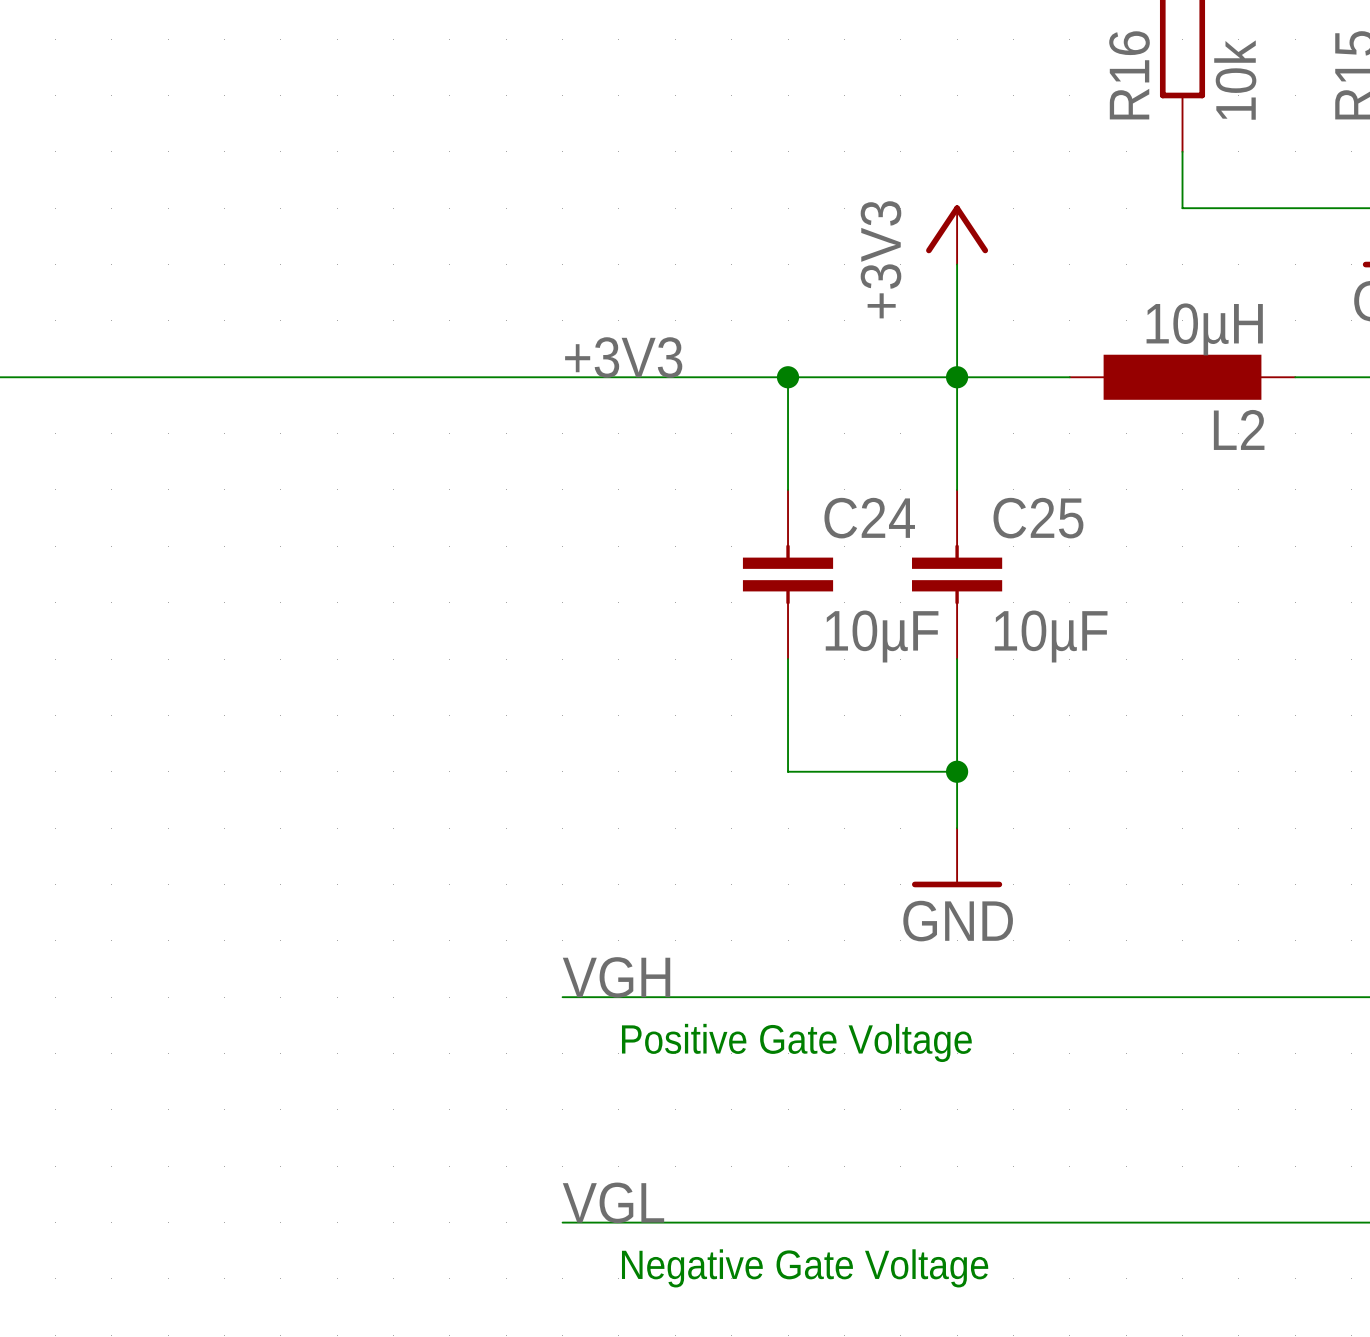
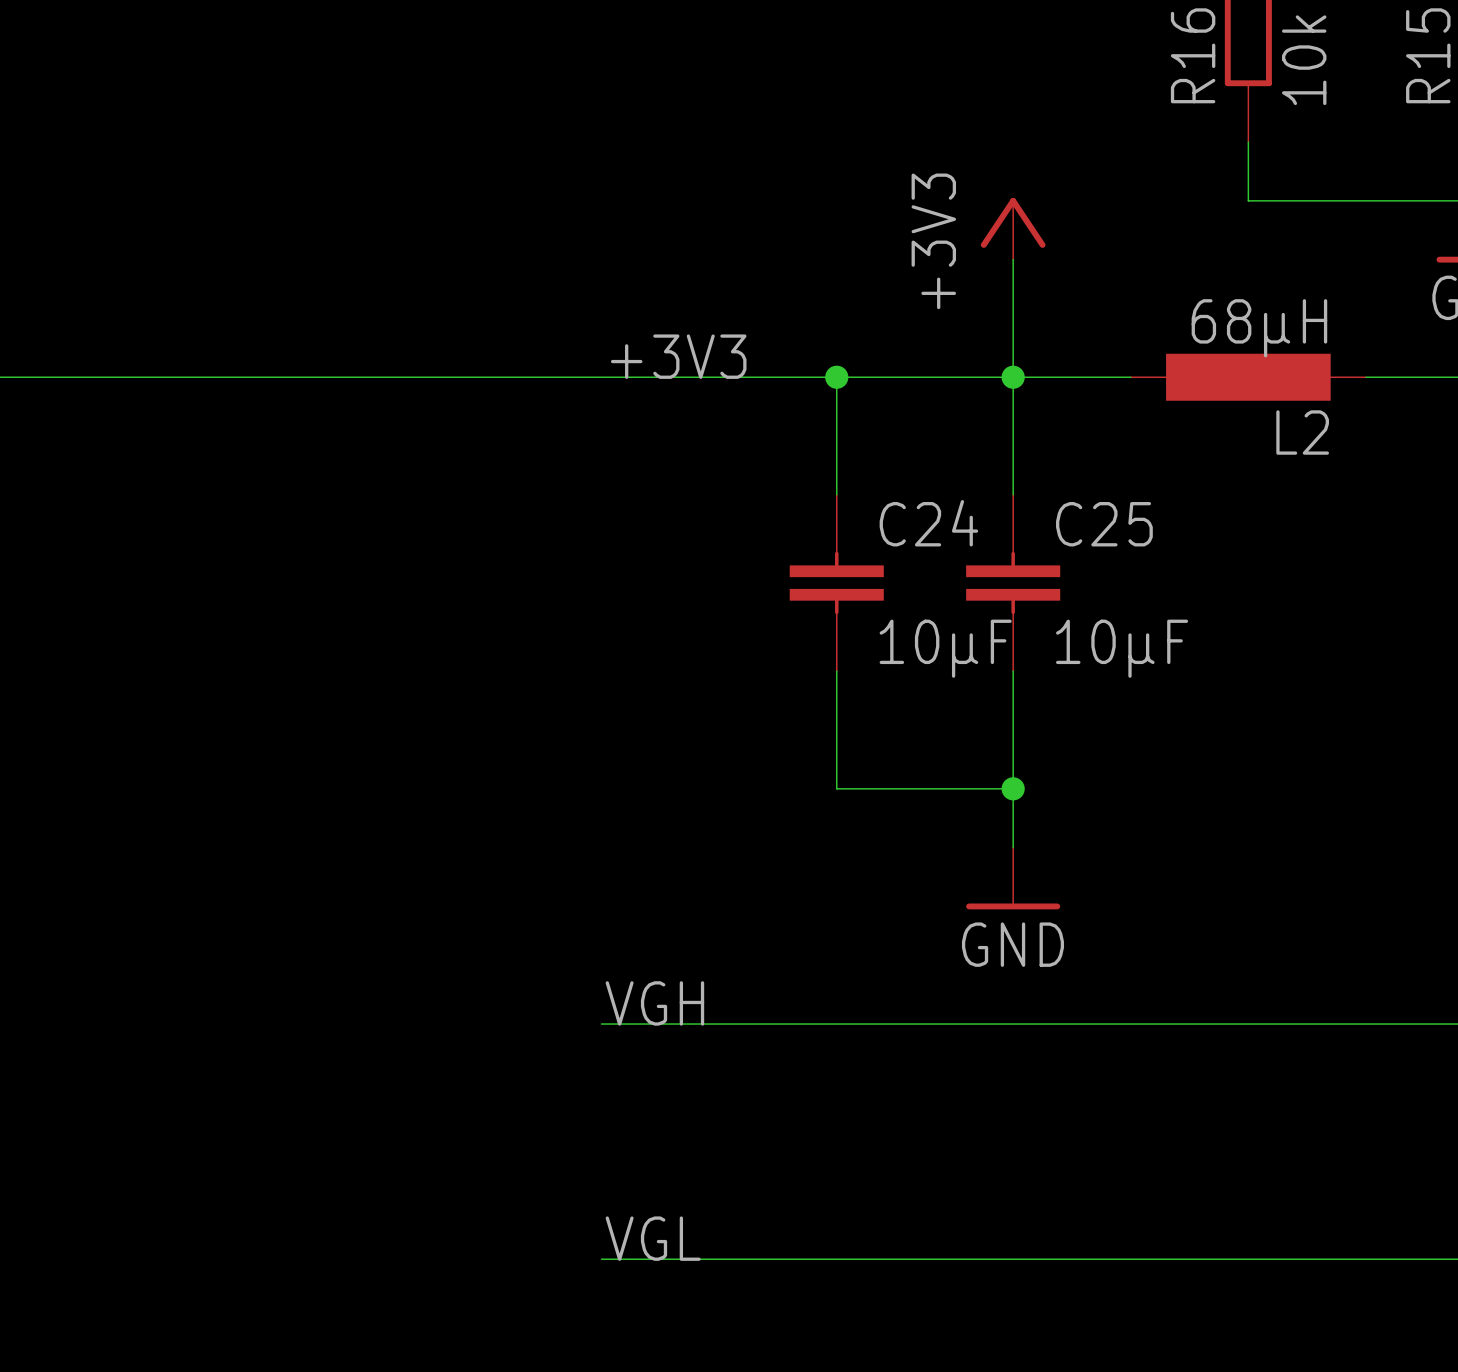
L2 value: 10µH (1204, 329) -> 68µH (1259, 328)
text: Positive Gate Voltage (796, 1042) -> none
text: Negative Gate Voltage (805, 1268) -> none

